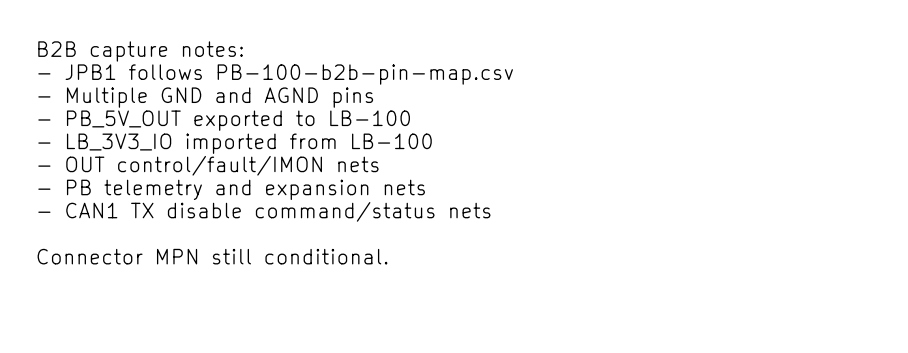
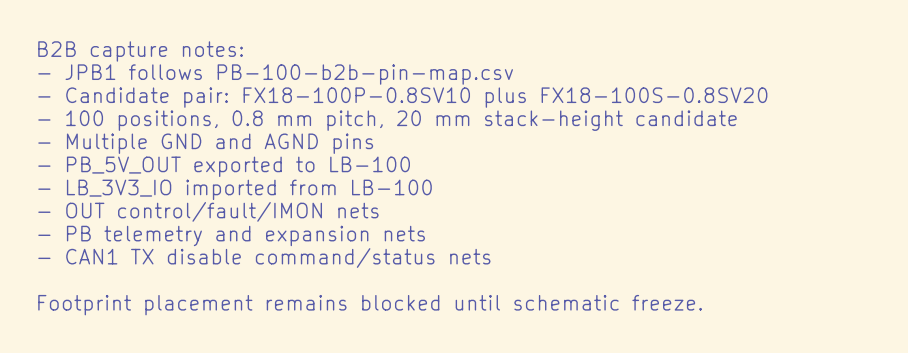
text: - Multiple GND and AGND pins (205, 97) -> - Candidate pair: FX18-100P-0.8SV10 plus FX18-100S-0.8SV20 (402, 97)
text: - PB_5V_OUT exported to LB-100 (224, 120) -> - 100 positions, 0.8 mm pitch, 20 mm stack-height candidate (387, 120)
text: - LB_3V3_IO imported from LB-100 (235, 143) -> - Multiple GND and AGND pins (205, 143)
text: - OUT control/fault/IMON nets (208, 165) -> - PB_5V_OUT exported to LB-100 (224, 166)
text: - PB telemetry and expansion nets (231, 189) -> - LB_3V3_IO imported from LB-100 (235, 189)
text: - CAN1 TX disable command/status nets (264, 211) -> - OUT control/fault/IMON nets (208, 211)
text: none -> - PB telemetry and expansion nets (231, 235)
text: Connector MPN still conditional. (212, 256) -> - CAN1 TX disable command/status nets (264, 258)
text: none -> Footprint placement remains blocked until schematic freeze. (370, 305)

